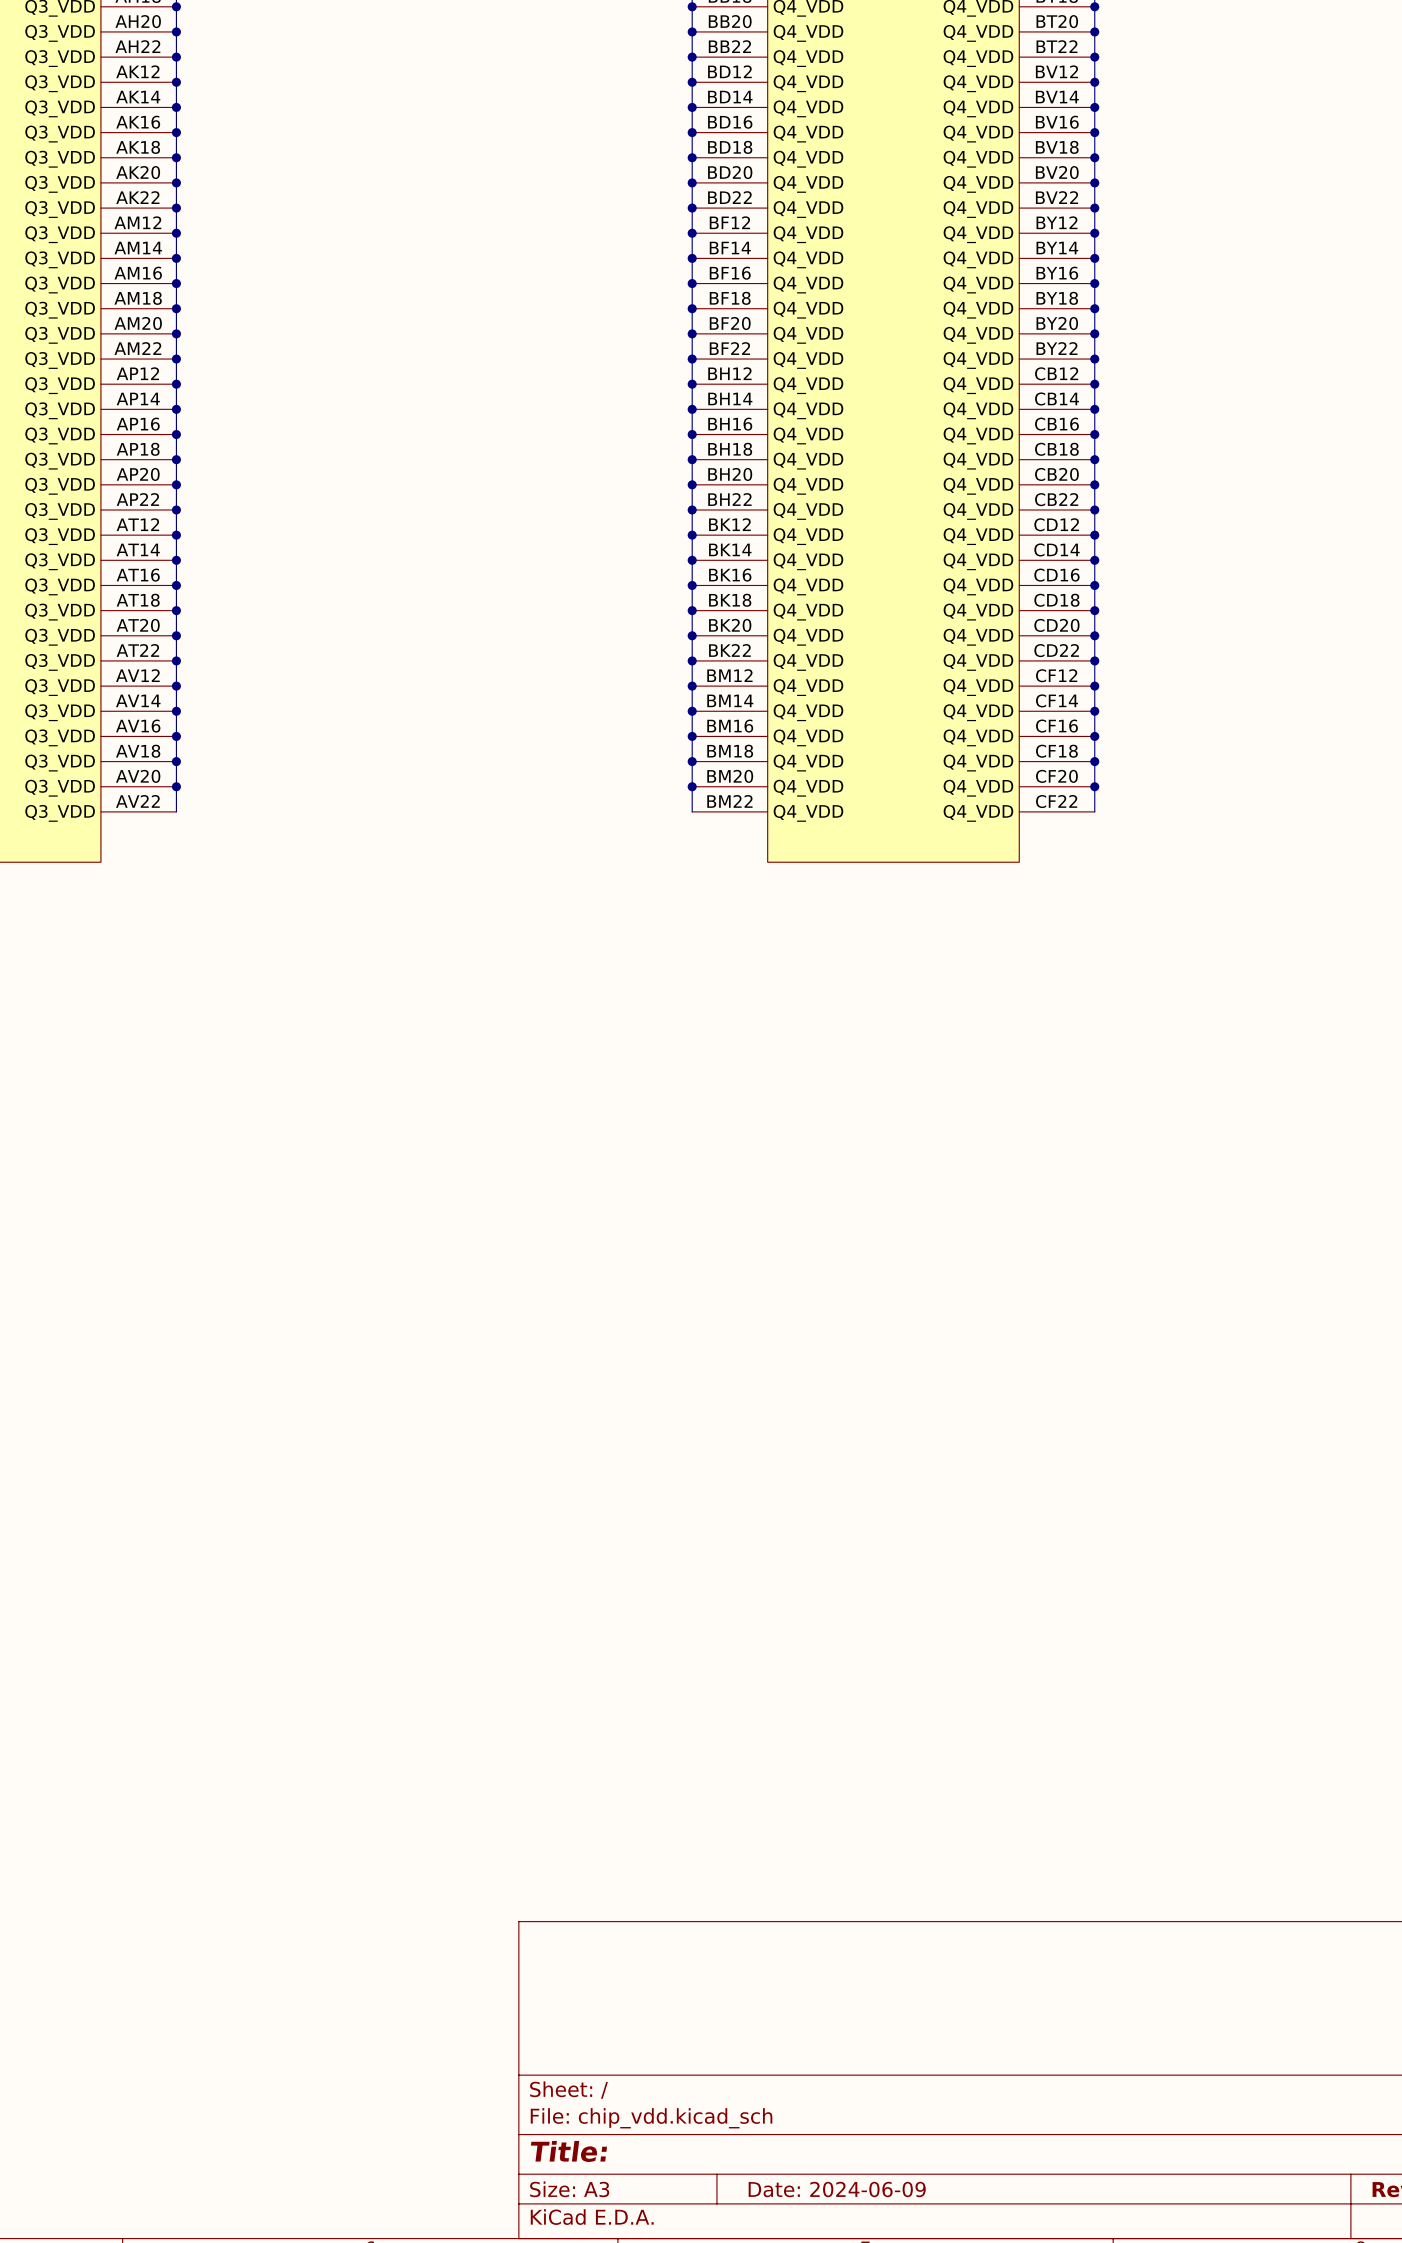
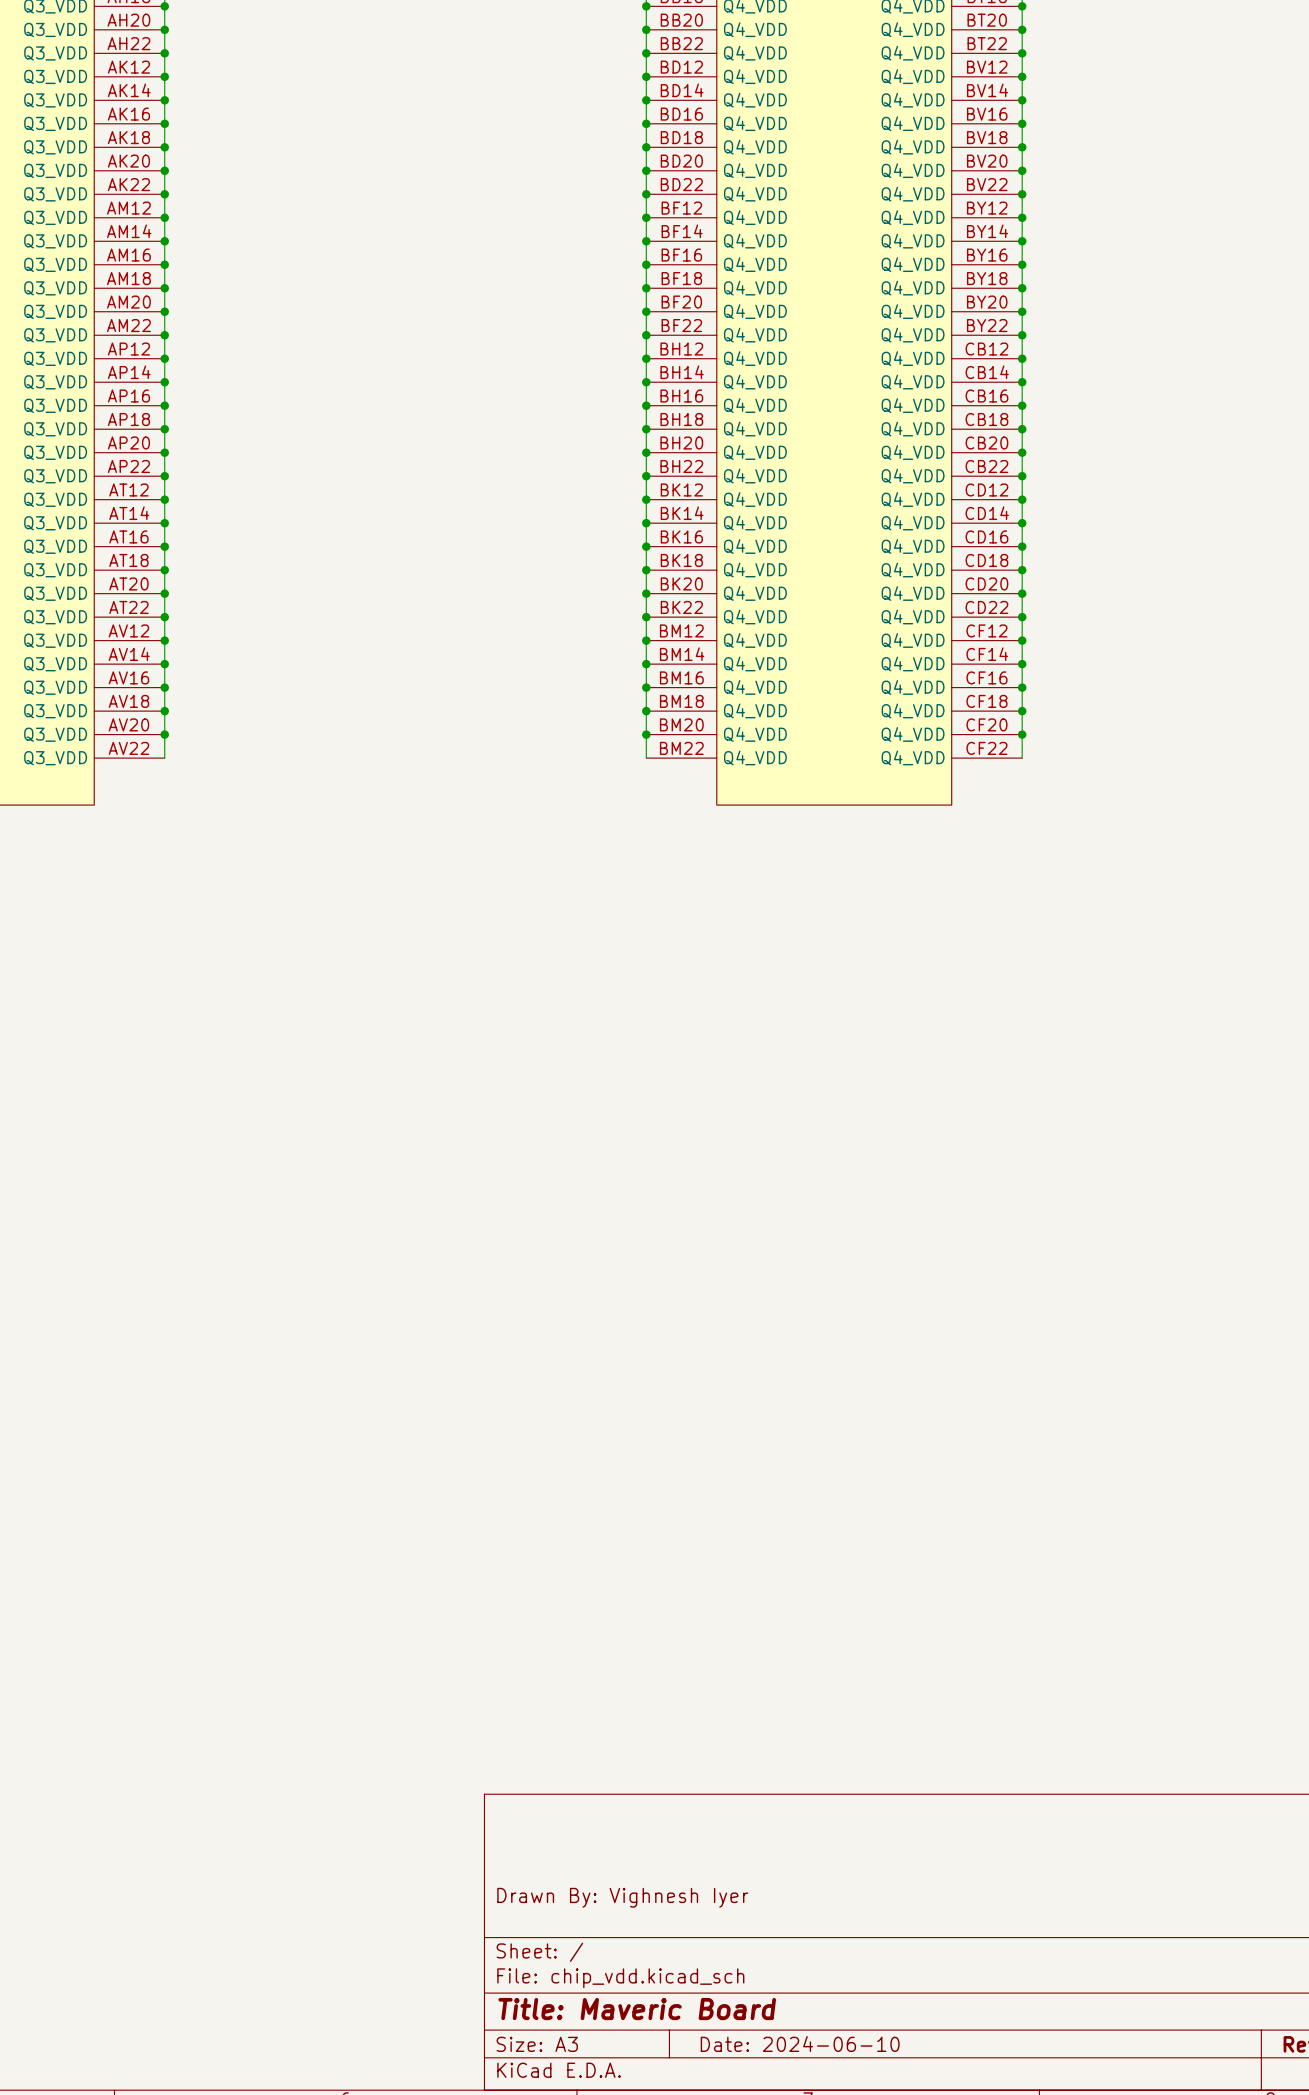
title block: none -> Drawn By: Vighnesh Iyer (622, 1897)
title block: Title: (568, 2151) -> Title: Maveric Board (637, 2009)
title block: Date: 2024-06-09 (837, 2189) -> Date: 2024-06-10 (800, 2044)

